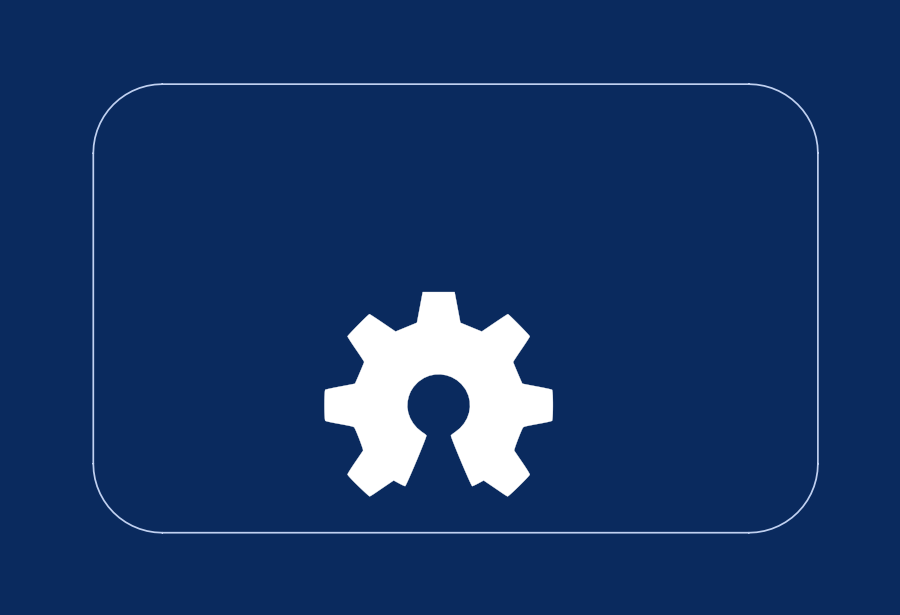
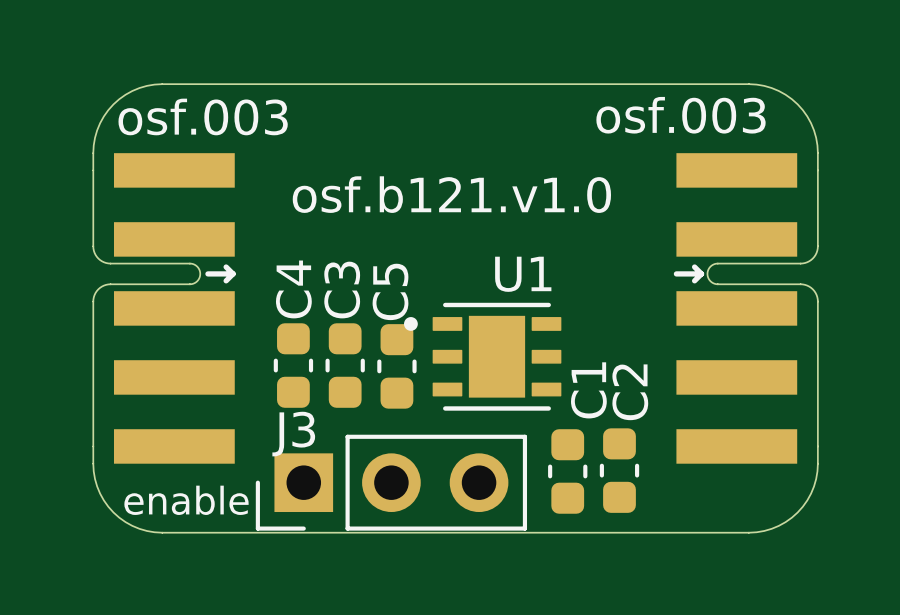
text: none -> osf.003 (681, 115)
text: none -> osf.003 (203, 116)
board edge: (93, 170) (93, 446) -> none
board edge: (817, 170) (817, 446) -> none
text: none -> osf.b121.v1.0 (451, 194)
drawing: [324, 291, 554, 497] -> none
part: none -> (164, 308)
part: none -> (746, 308)
U1: none -> (482, 356)
C4: none -> (293, 365)
C3: none -> (345, 365)
C5: none -> (396, 366)
C2: none -> (619, 470)
C1: none -> (567, 471)
J3: none -> (391, 482)
text: none -> enable (186, 500)

